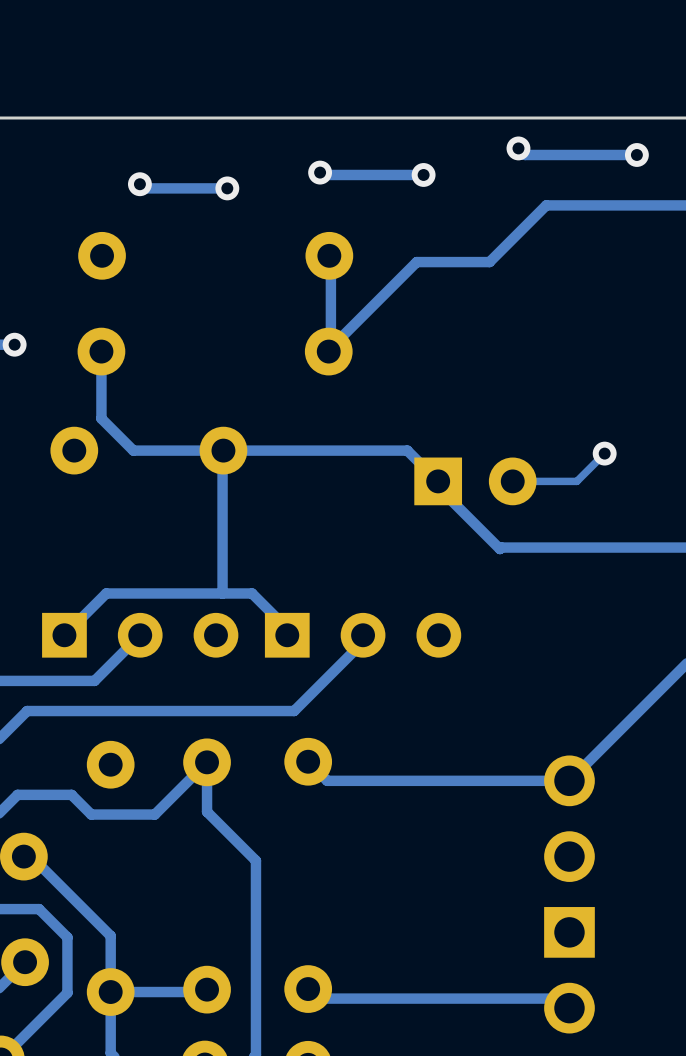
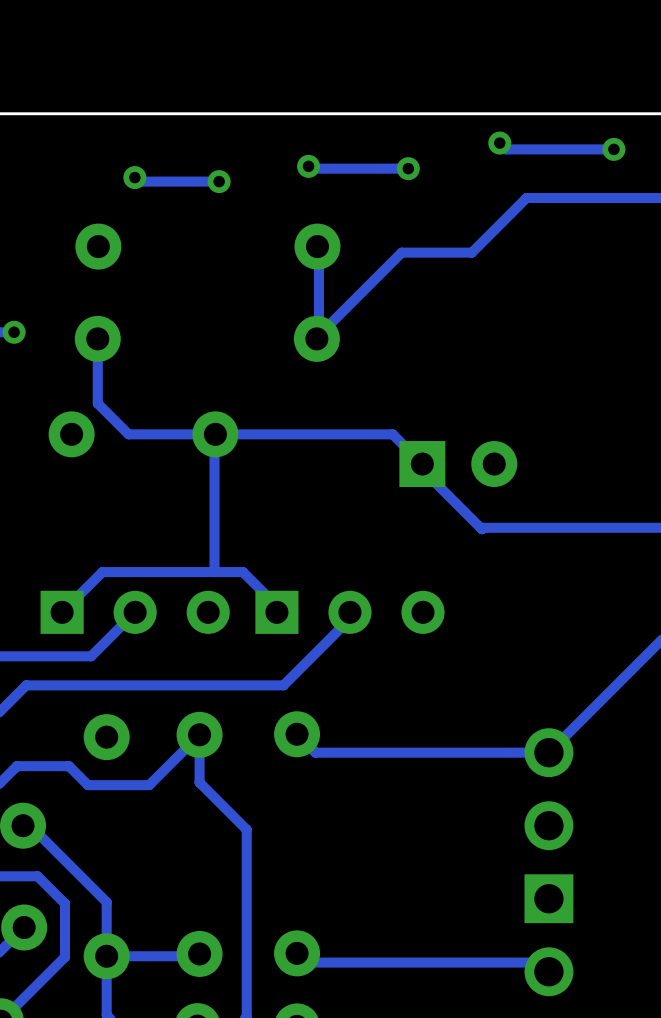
track: (604, 453) (576, 481) (512, 481) -> none
via: (604, 453) -> none

